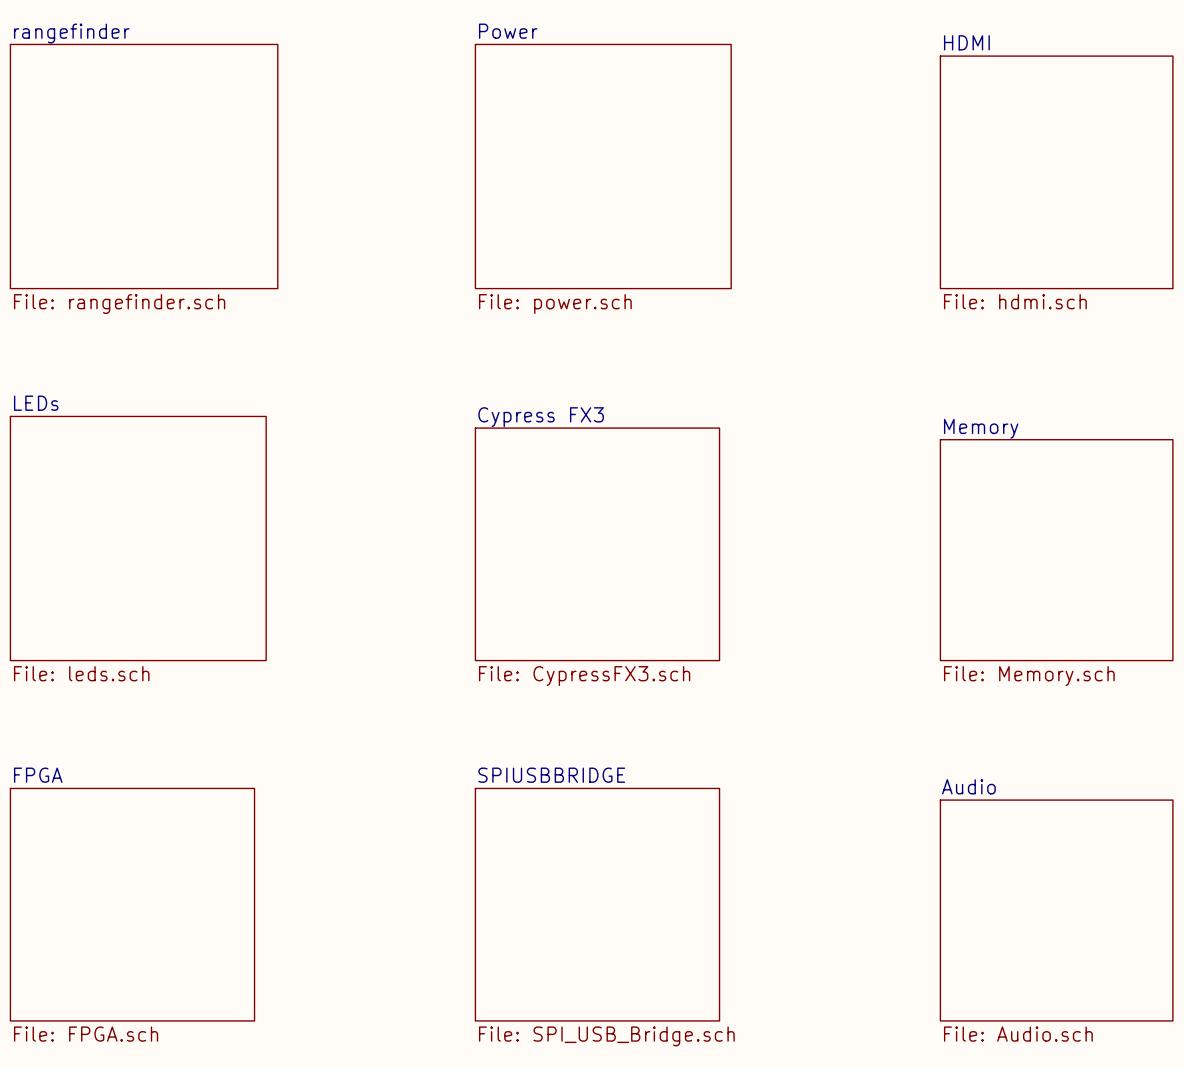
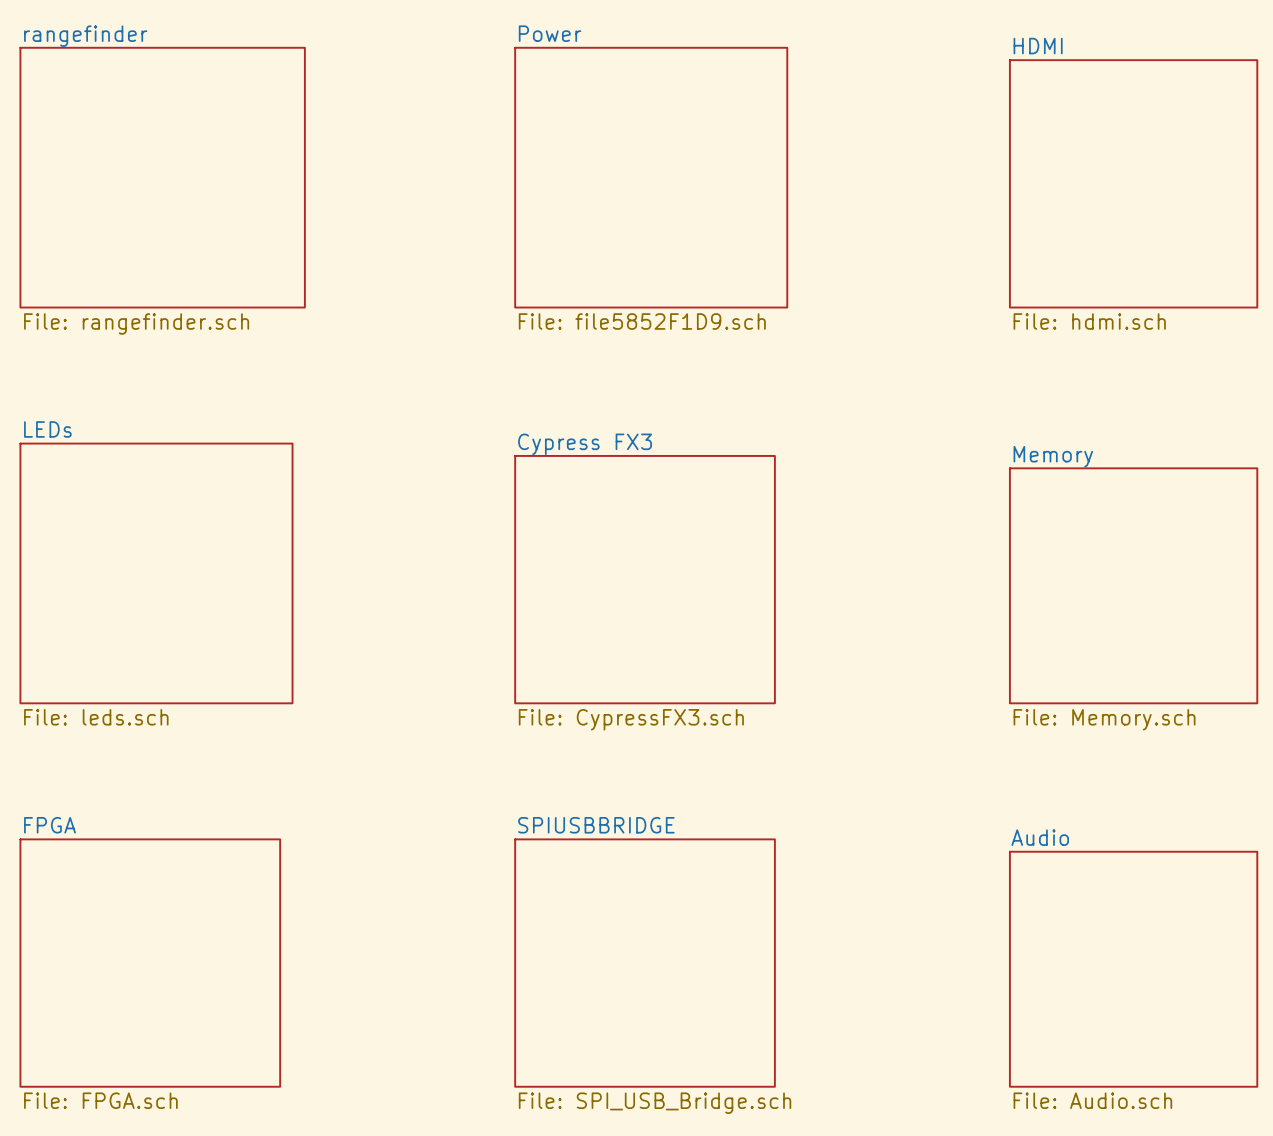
sheet Power value: File: power.sch (555, 304) -> File: file5852F1D9.sch (642, 321)

